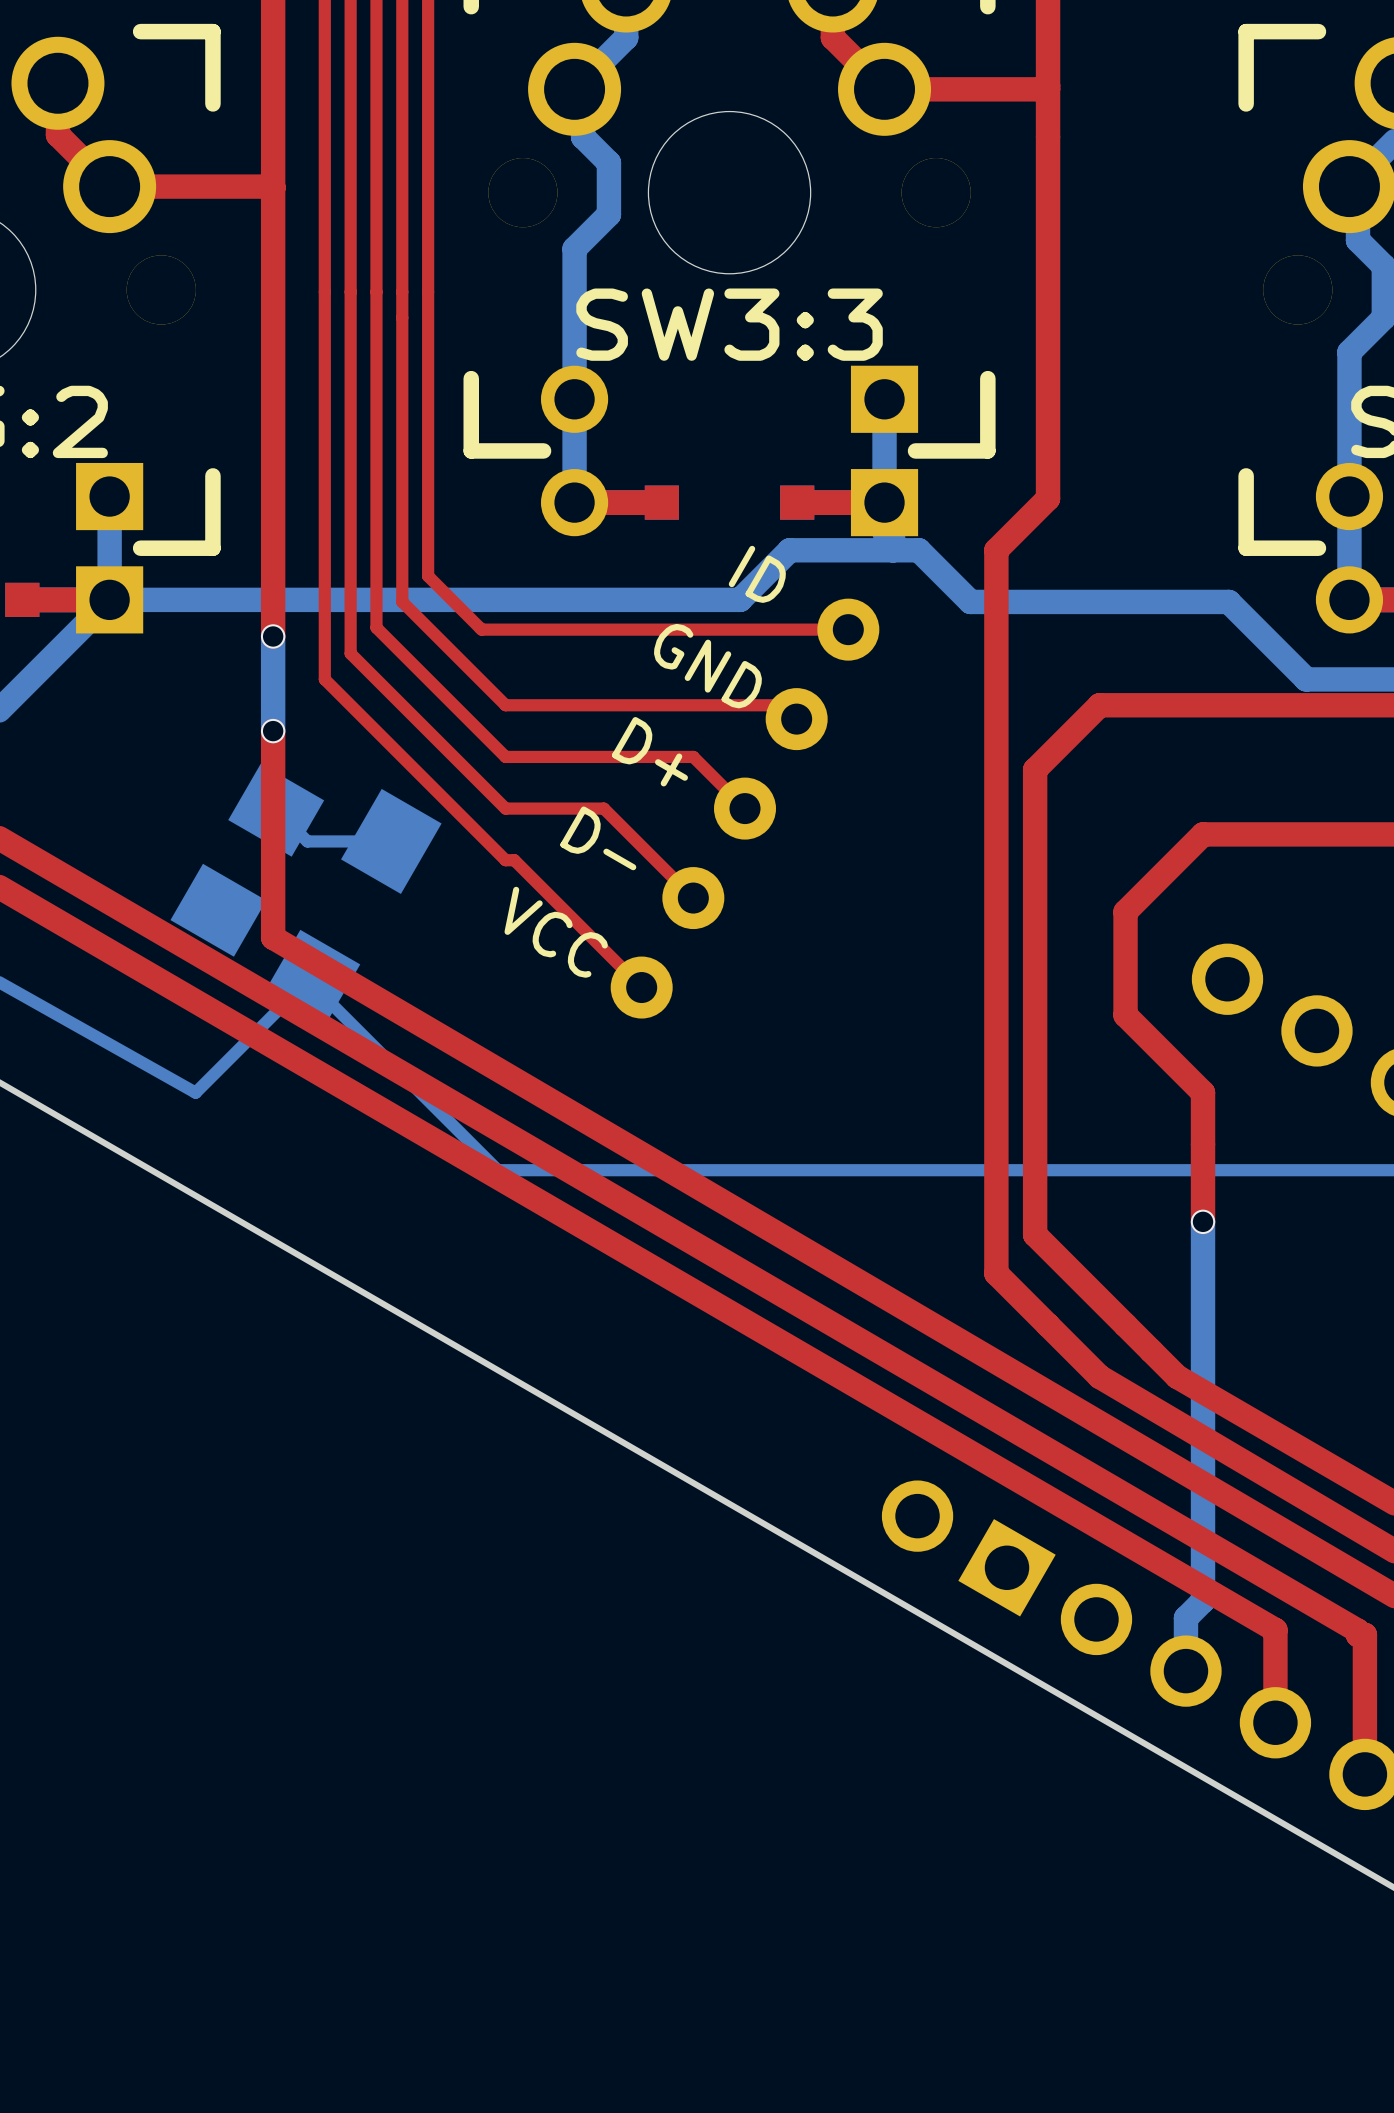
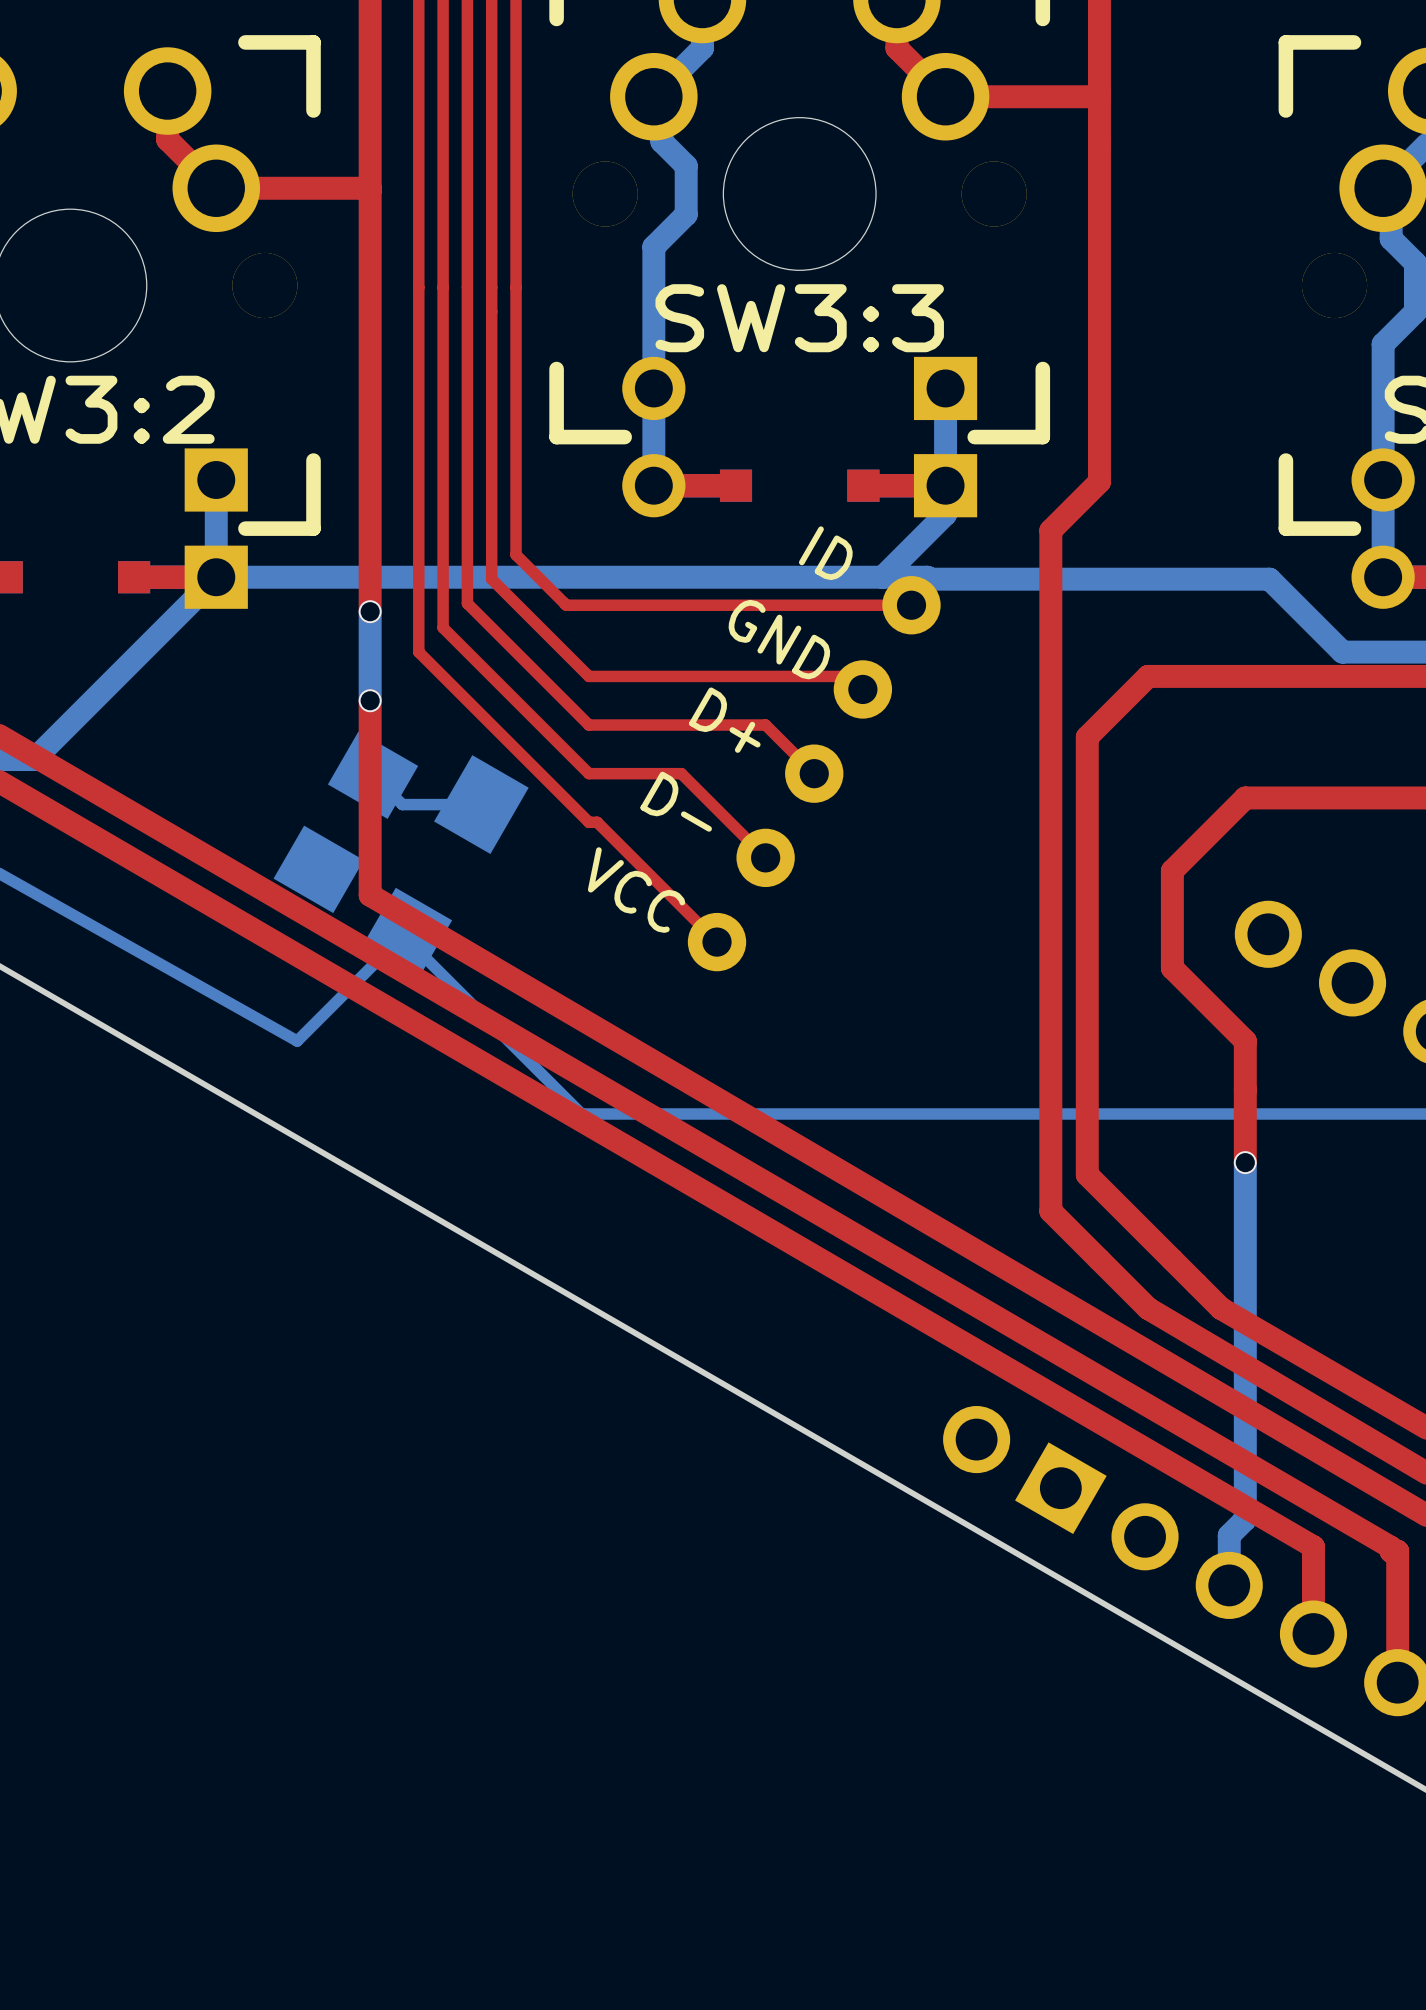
bottom track: none -> (945, 514) (882, 577)
bottom track: (740, 599) (789, 550) (918, 550) (970, 601) -> (809, 577) (1026, 579)

